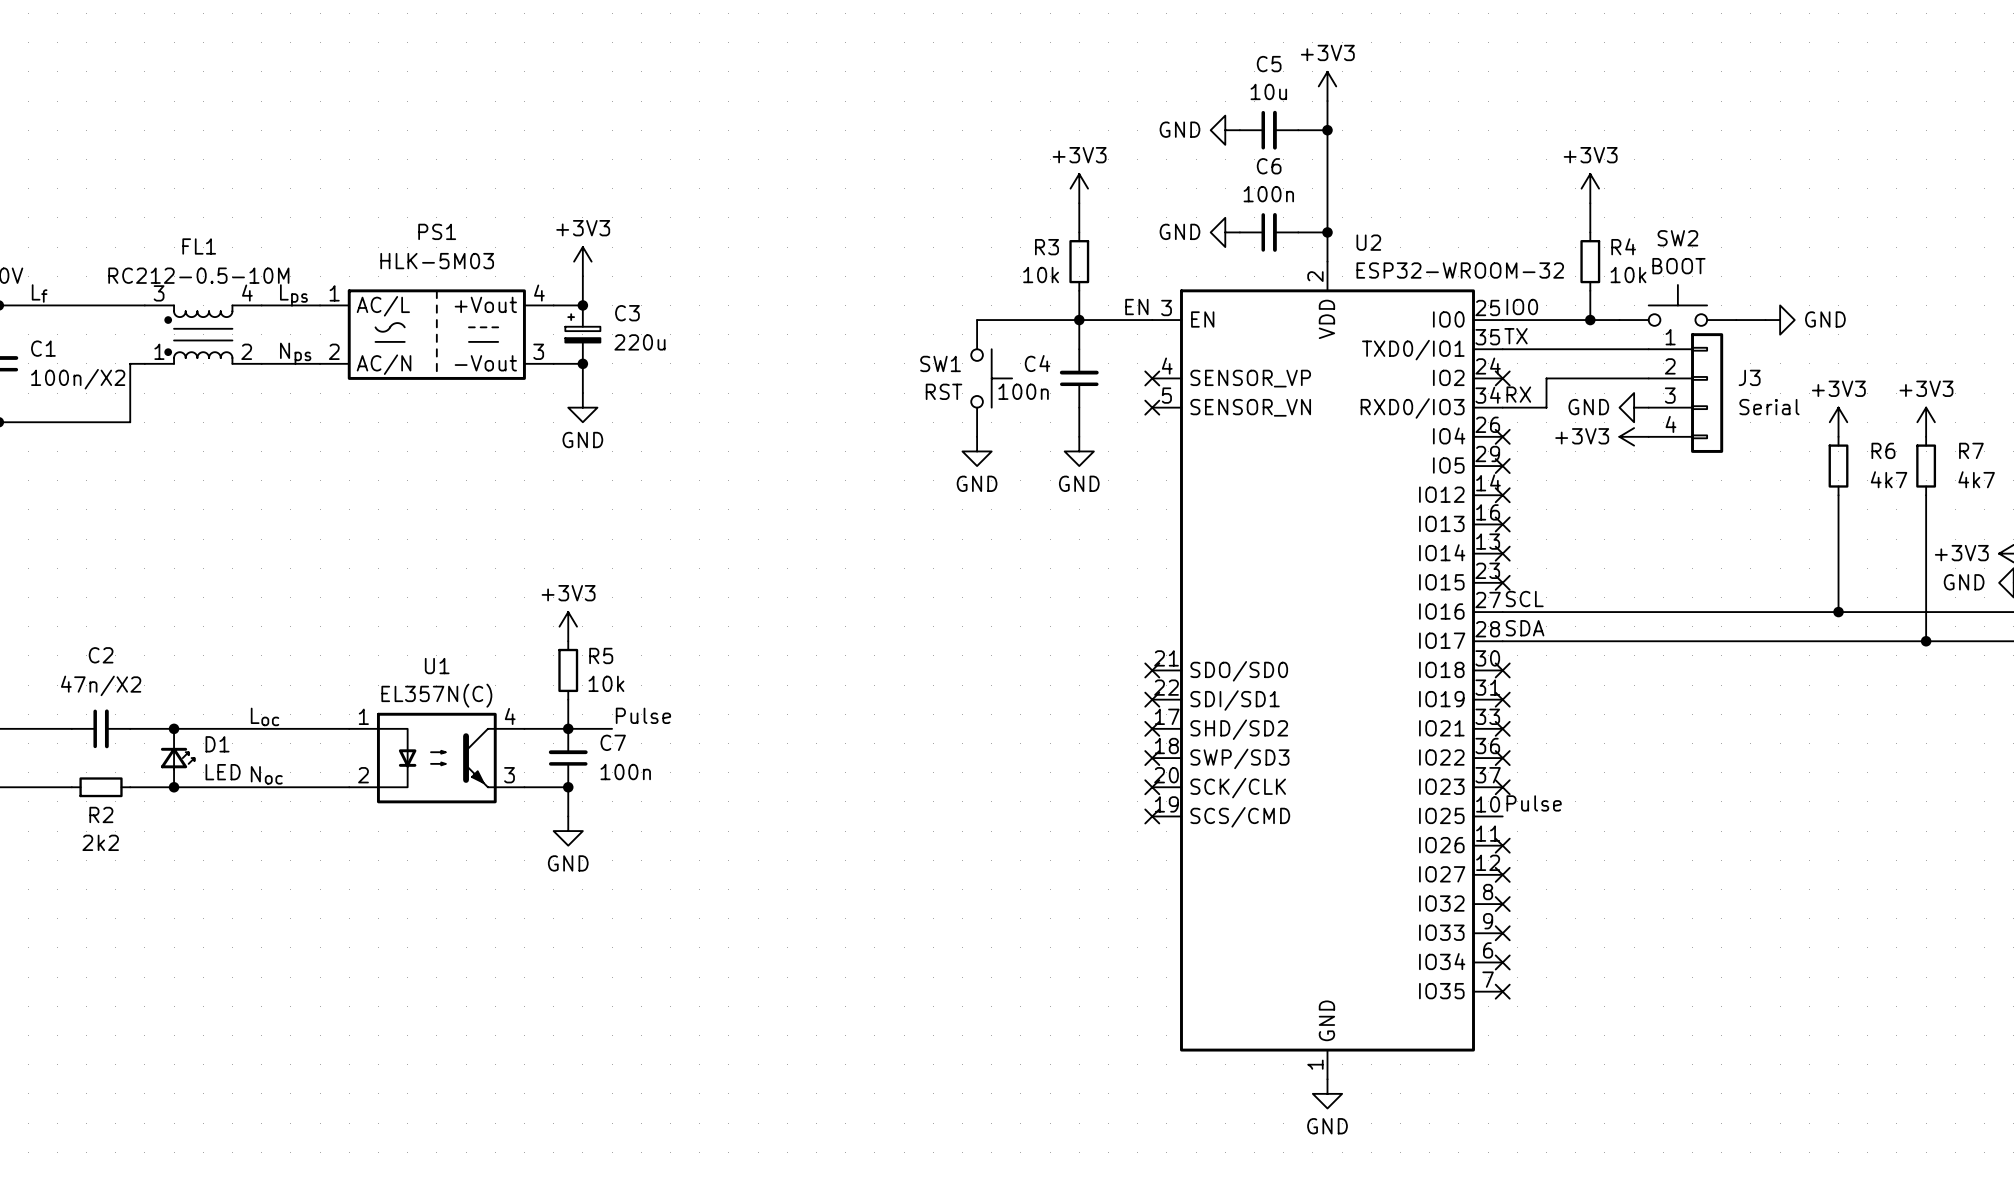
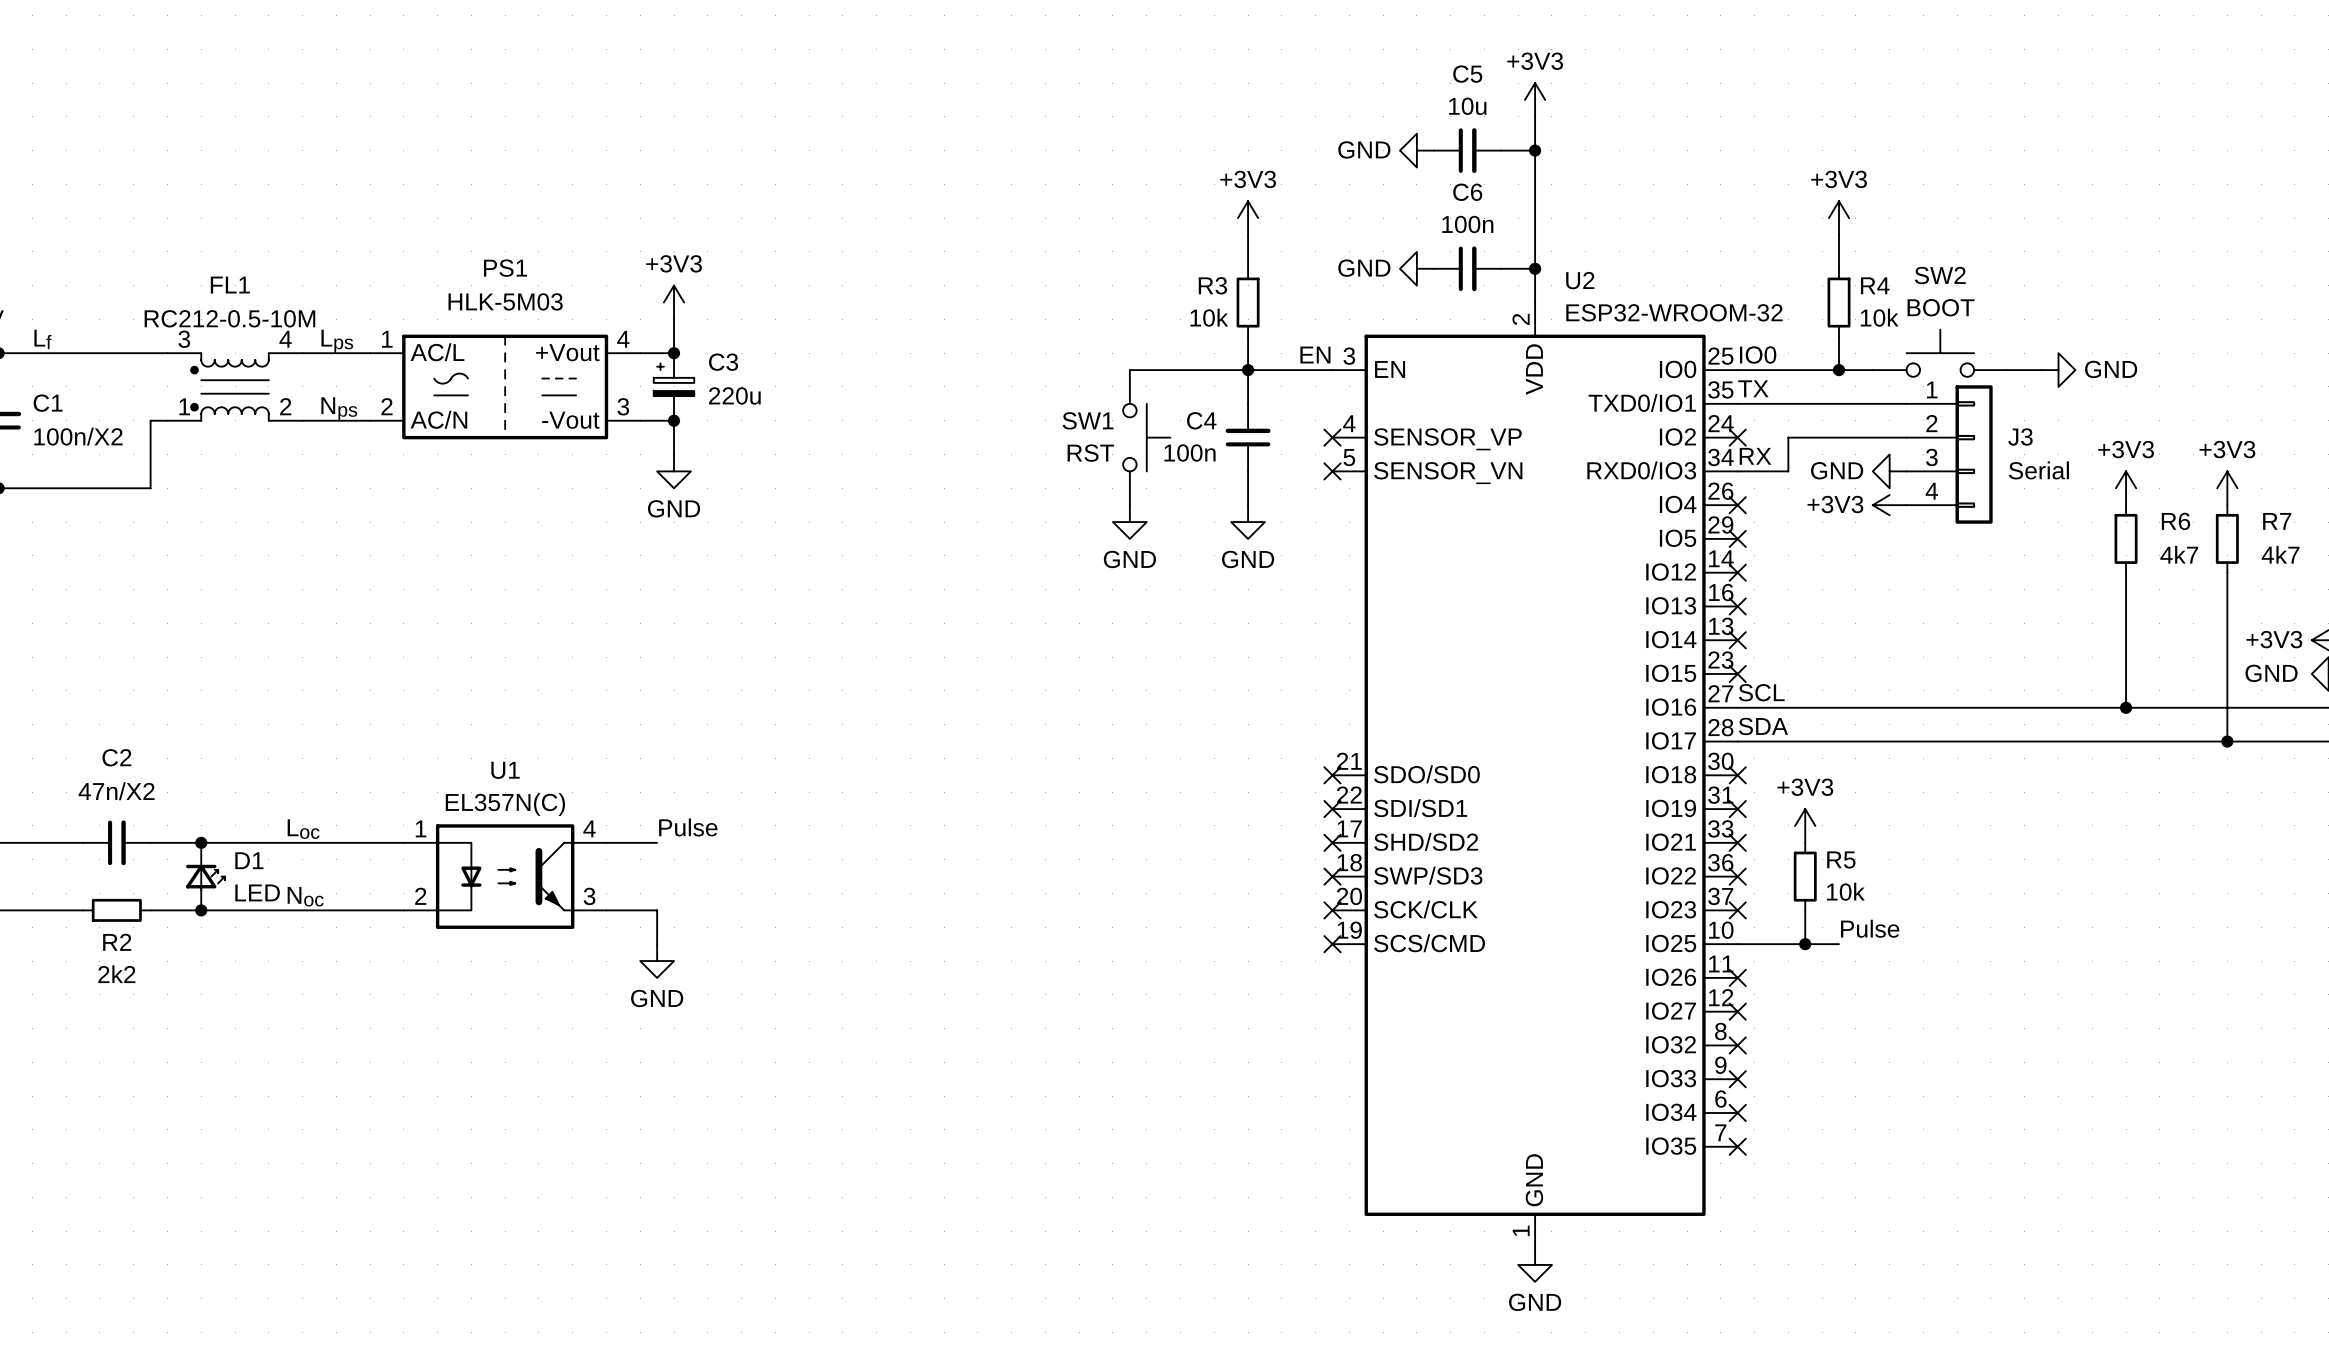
power symbol: +3V3 (568, 626) -> none
R5 position: (568, 670) -> (1805, 876)
wire: (568, 699) (568, 728) (612, 728) -> none
power symbol: none -> +3V3 (1805, 825)
label position: Pulse (643, 715) -> Pulse (688, 827)
junction: (568, 728) -> none
C7: 100n (568, 758) -> none
junction: (568, 787) -> none
wire: none -> (1805, 910) (1805, 944)
label position: Pulse (1534, 803) -> Pulse (1870, 928)
wire: none -> (1737, 944) (1839, 944)
junction: none -> (1805, 944)

